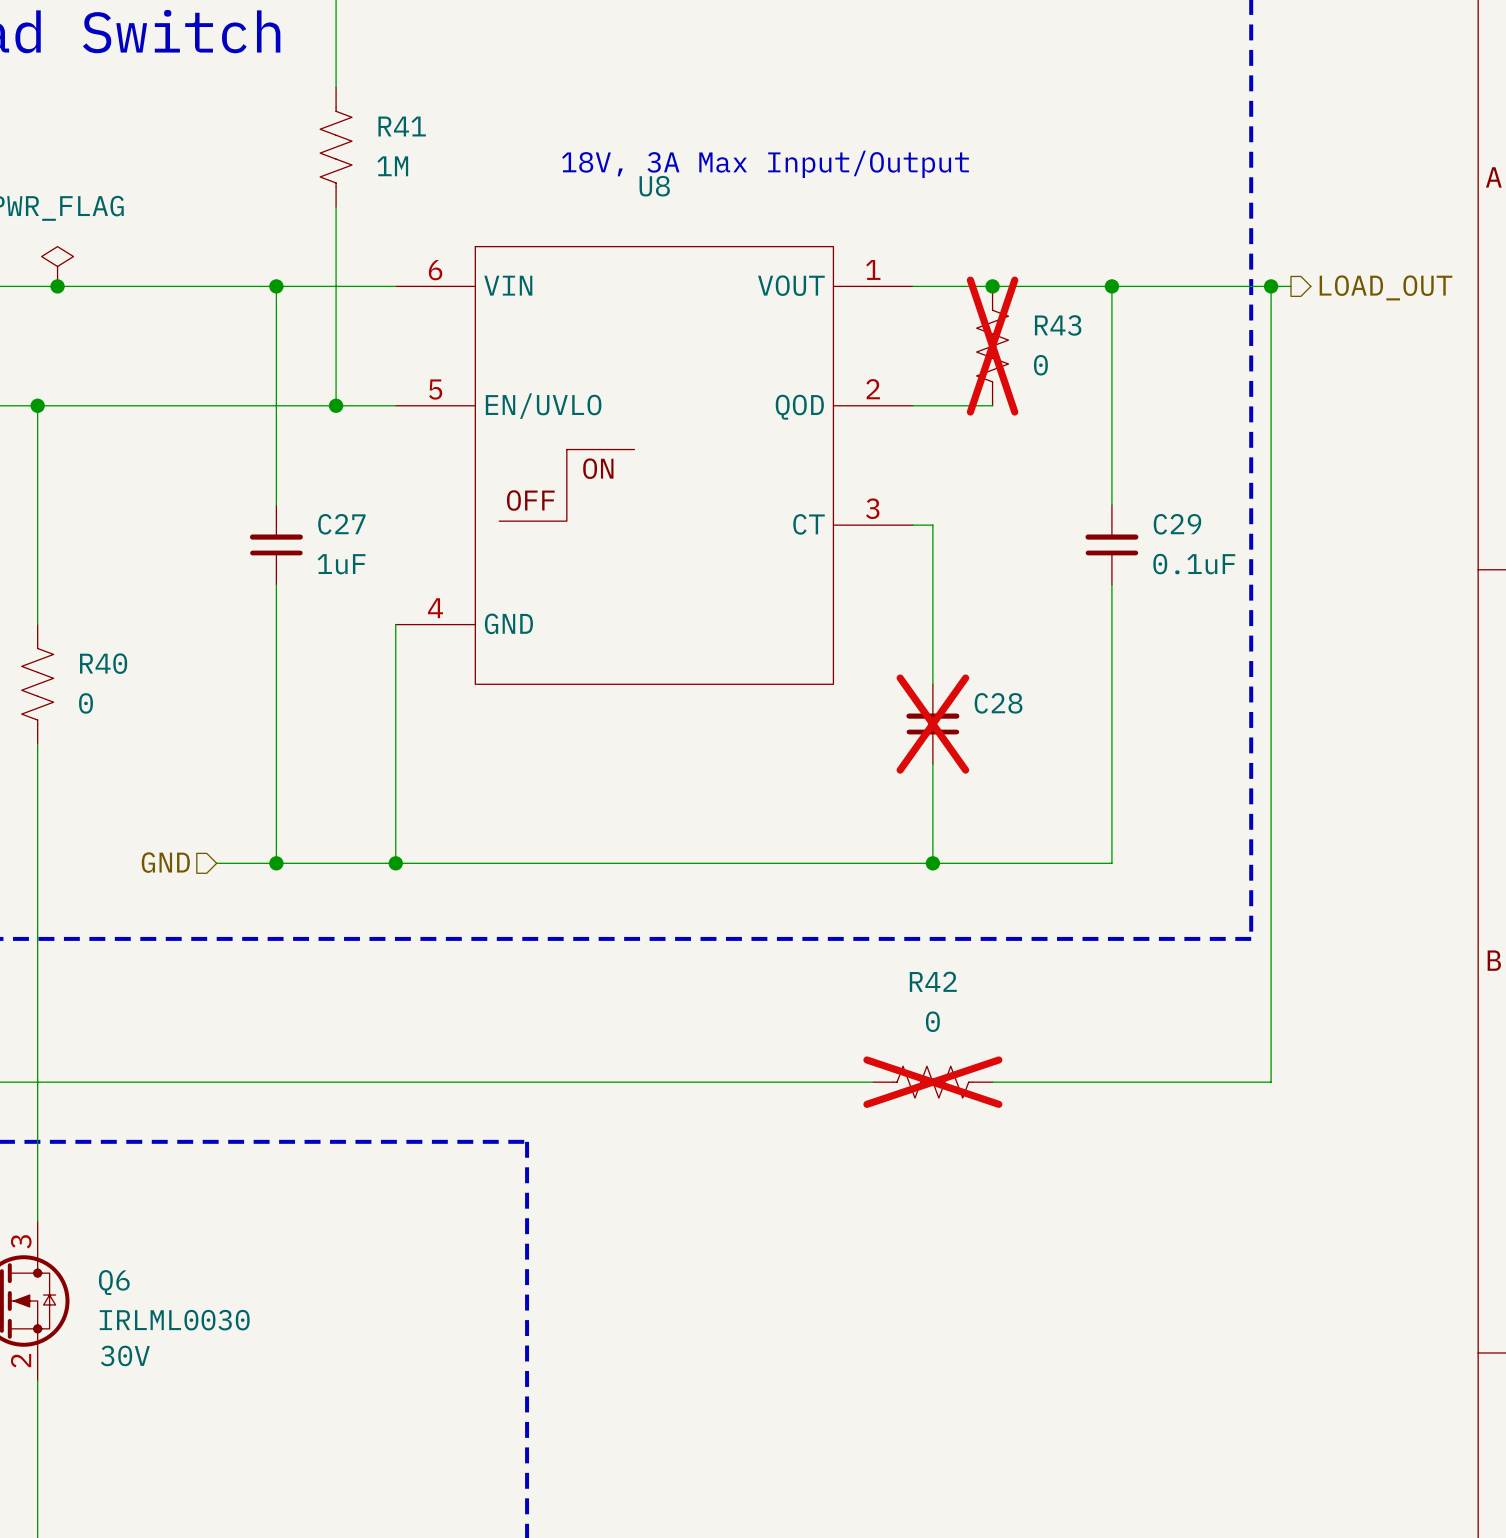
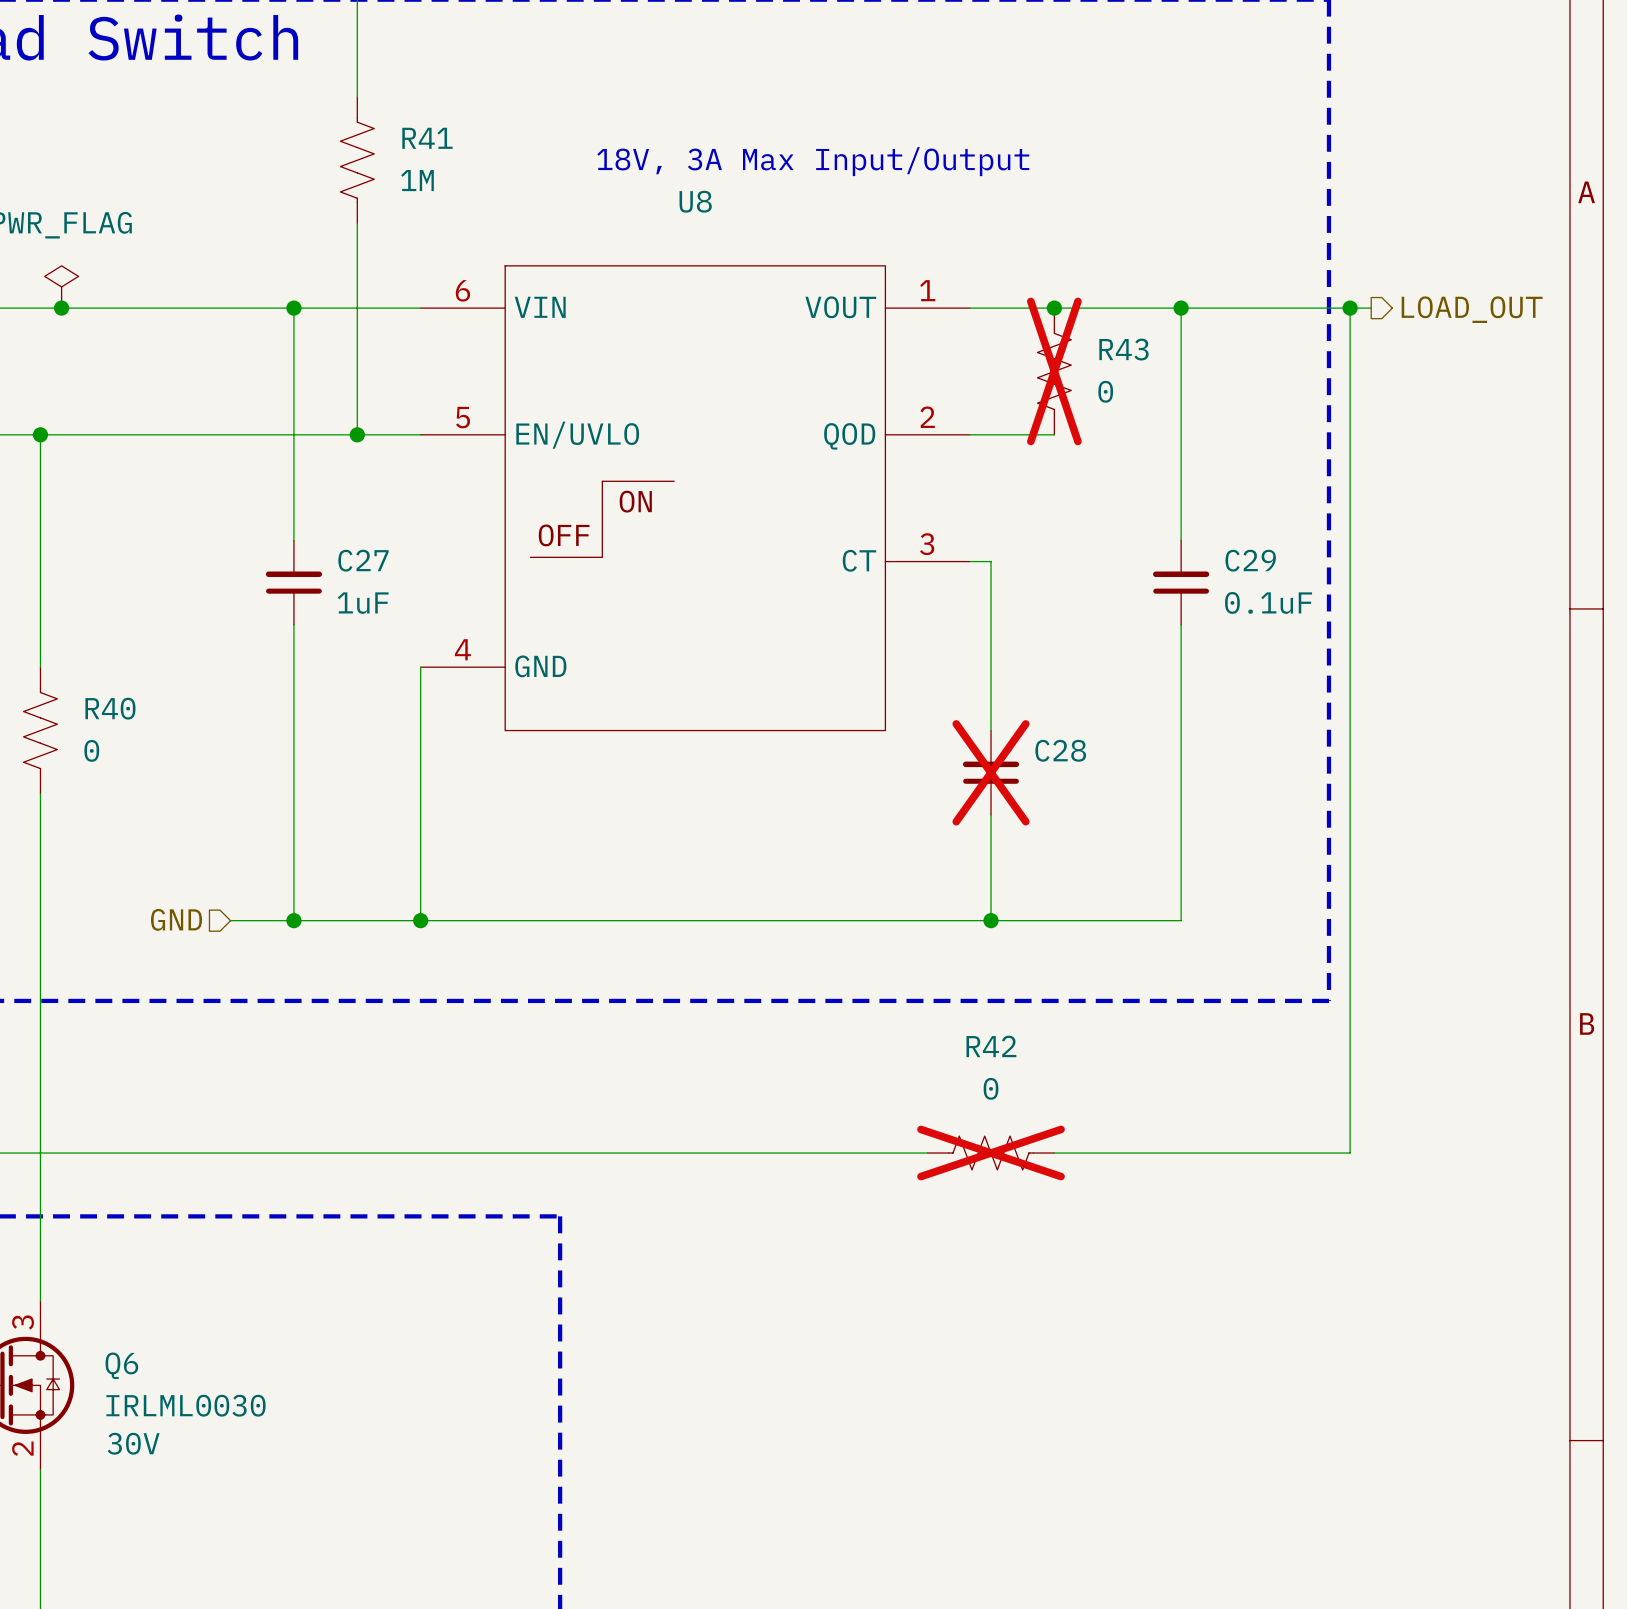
text position: 18V, 3A Max Input/Output (765, 164) -> 18V, 3A Max Input/Output (813, 161)

